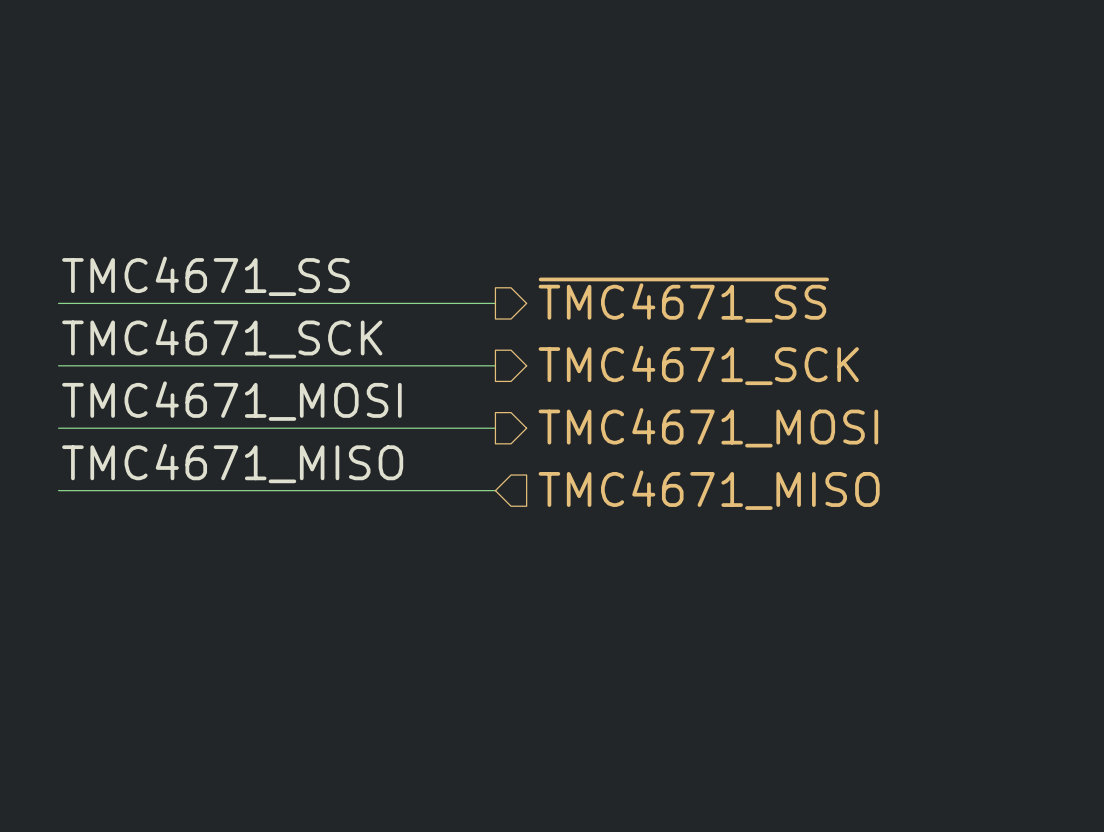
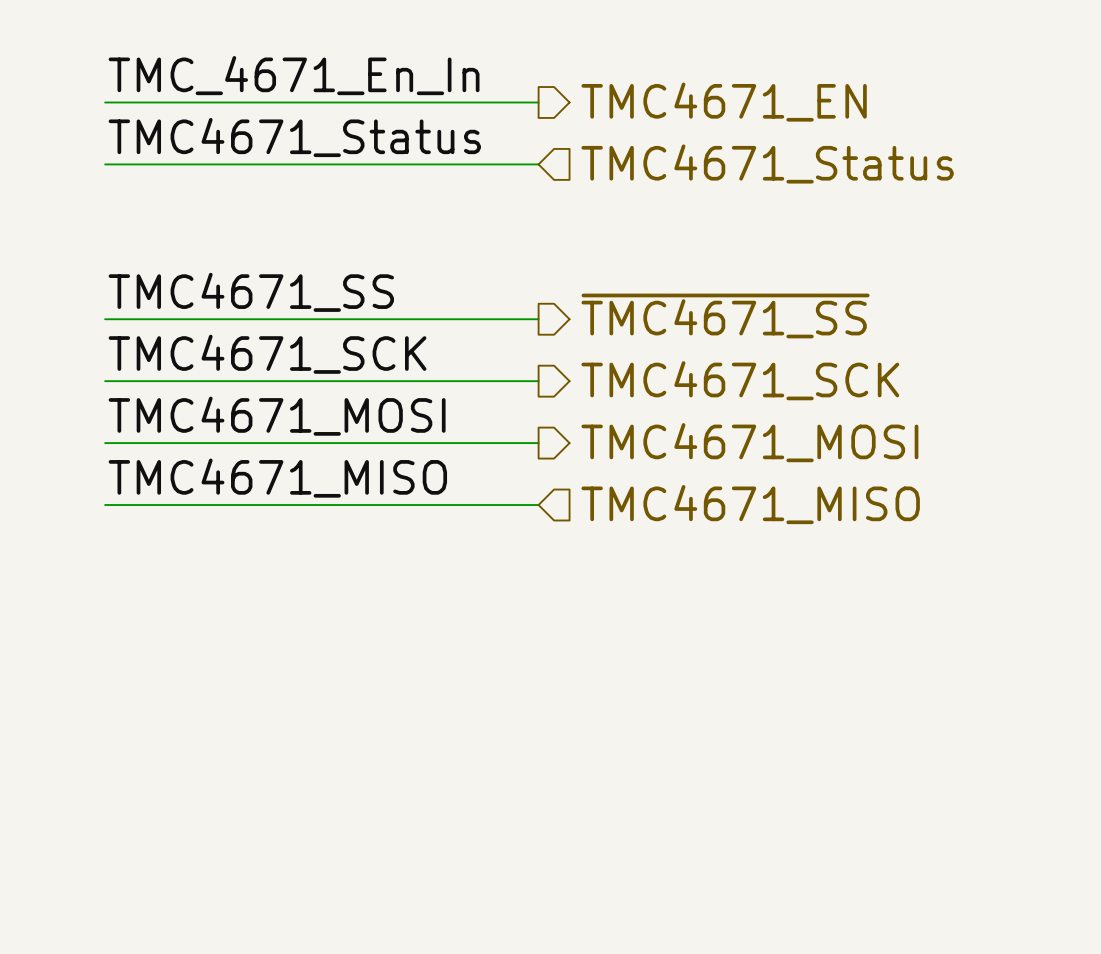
label: none -> TMC_4671_En_In (294, 75)
wire: none -> (105, 102) (538, 102)
hierarchical label: none -> TMC4671_EN (724, 102)
label: none -> TMC4671_Status (294, 137)
hierarchical label: none -> TMC4671_Status (767, 164)
wire: none -> (105, 164) (538, 164)

